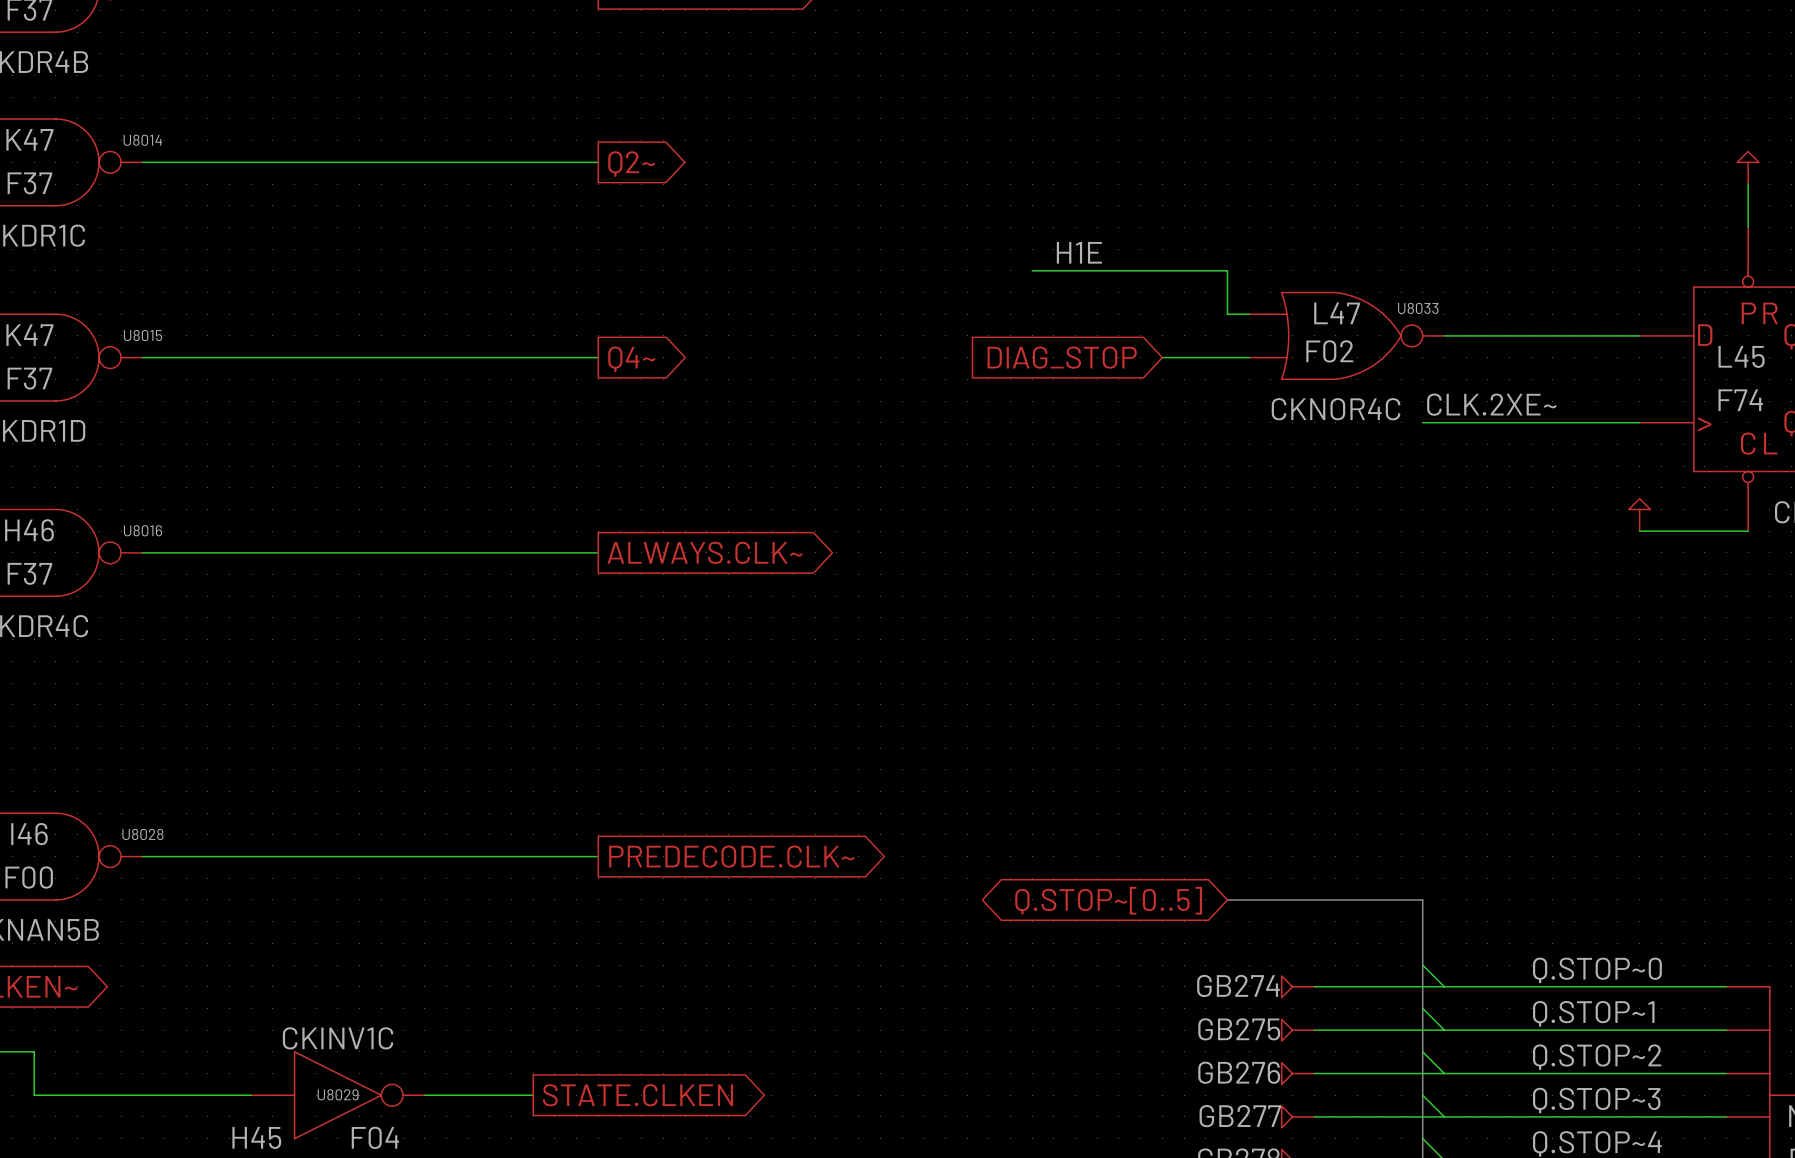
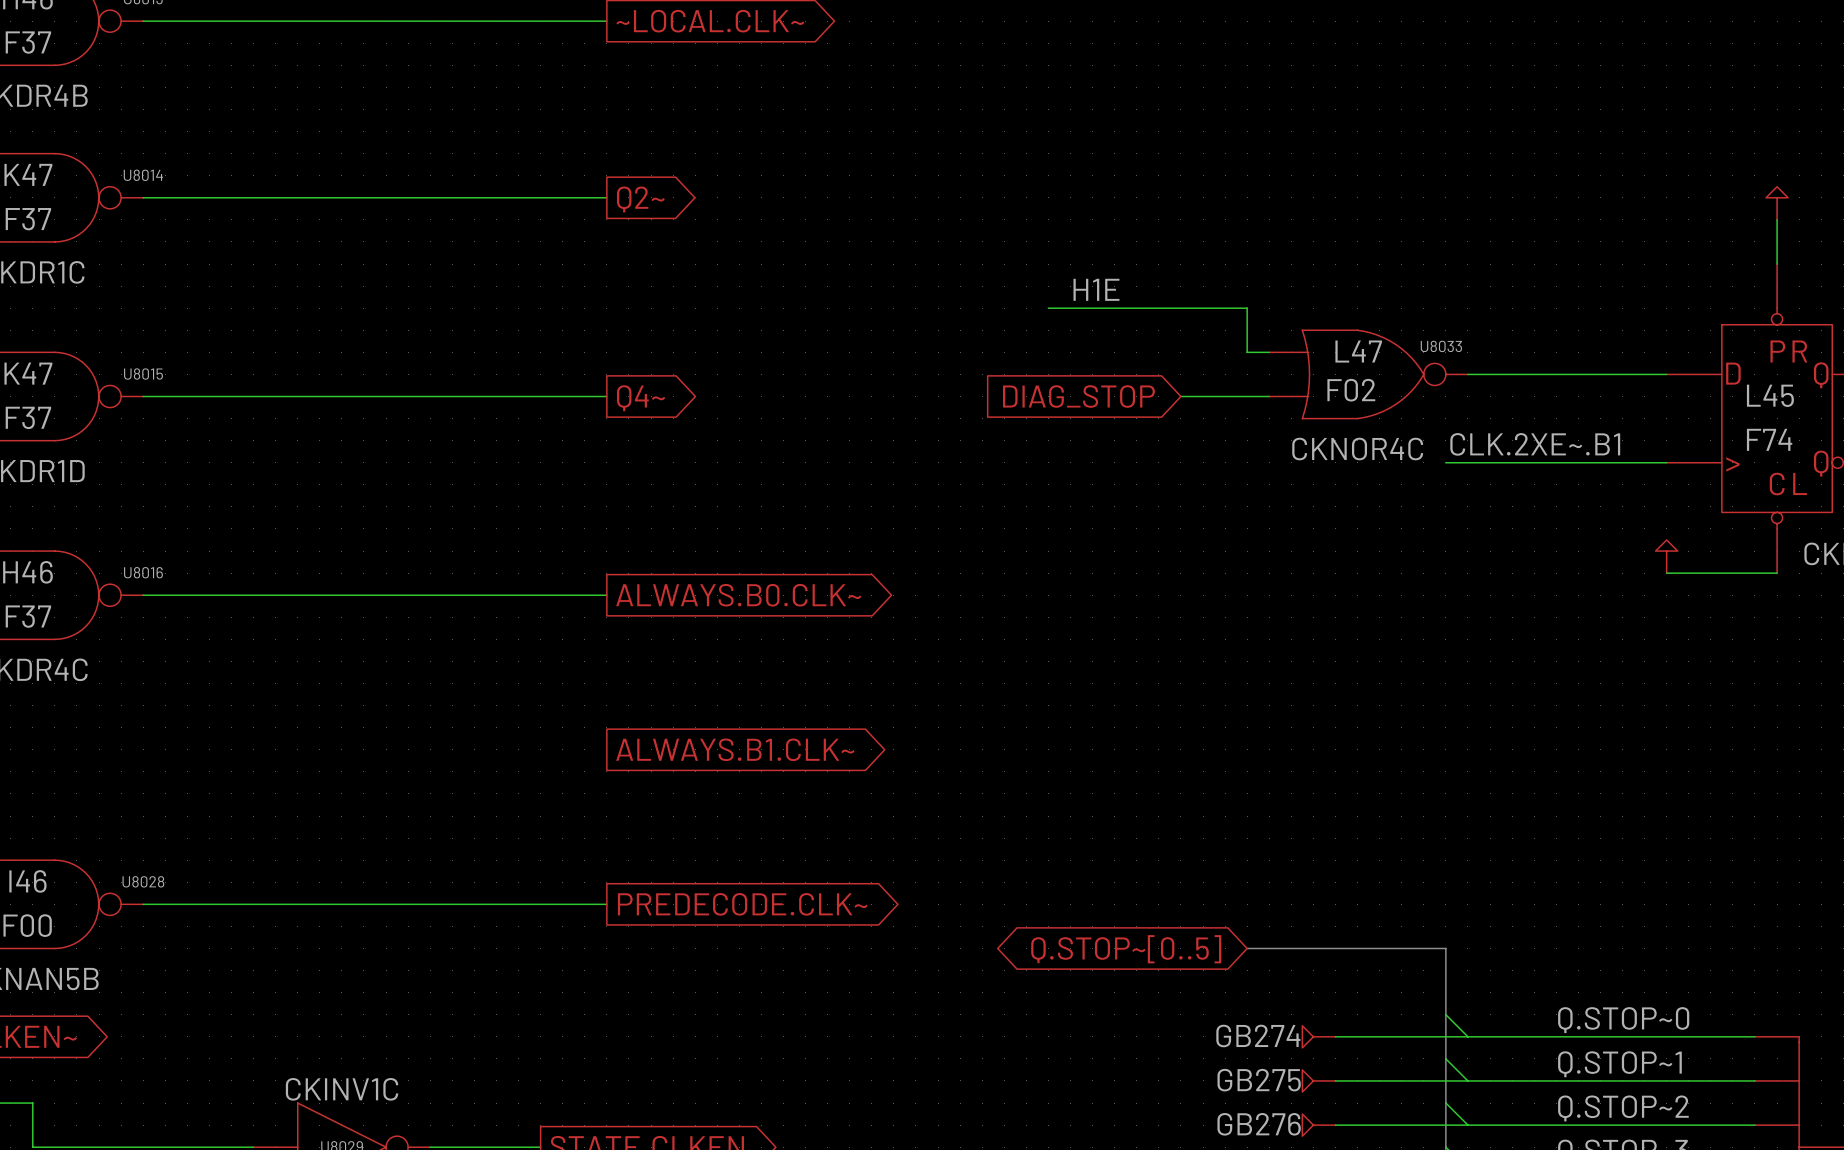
label: CLK.2XE~ (1491, 404) -> CLK.2XE~.B1 (1535, 444)
global label: ALWAYS.CLK~ (705, 552) -> ALWAYS.B0.CLK~ (738, 595)
global label: none -> ALWAYS.B1.CLK~ (735, 749)

